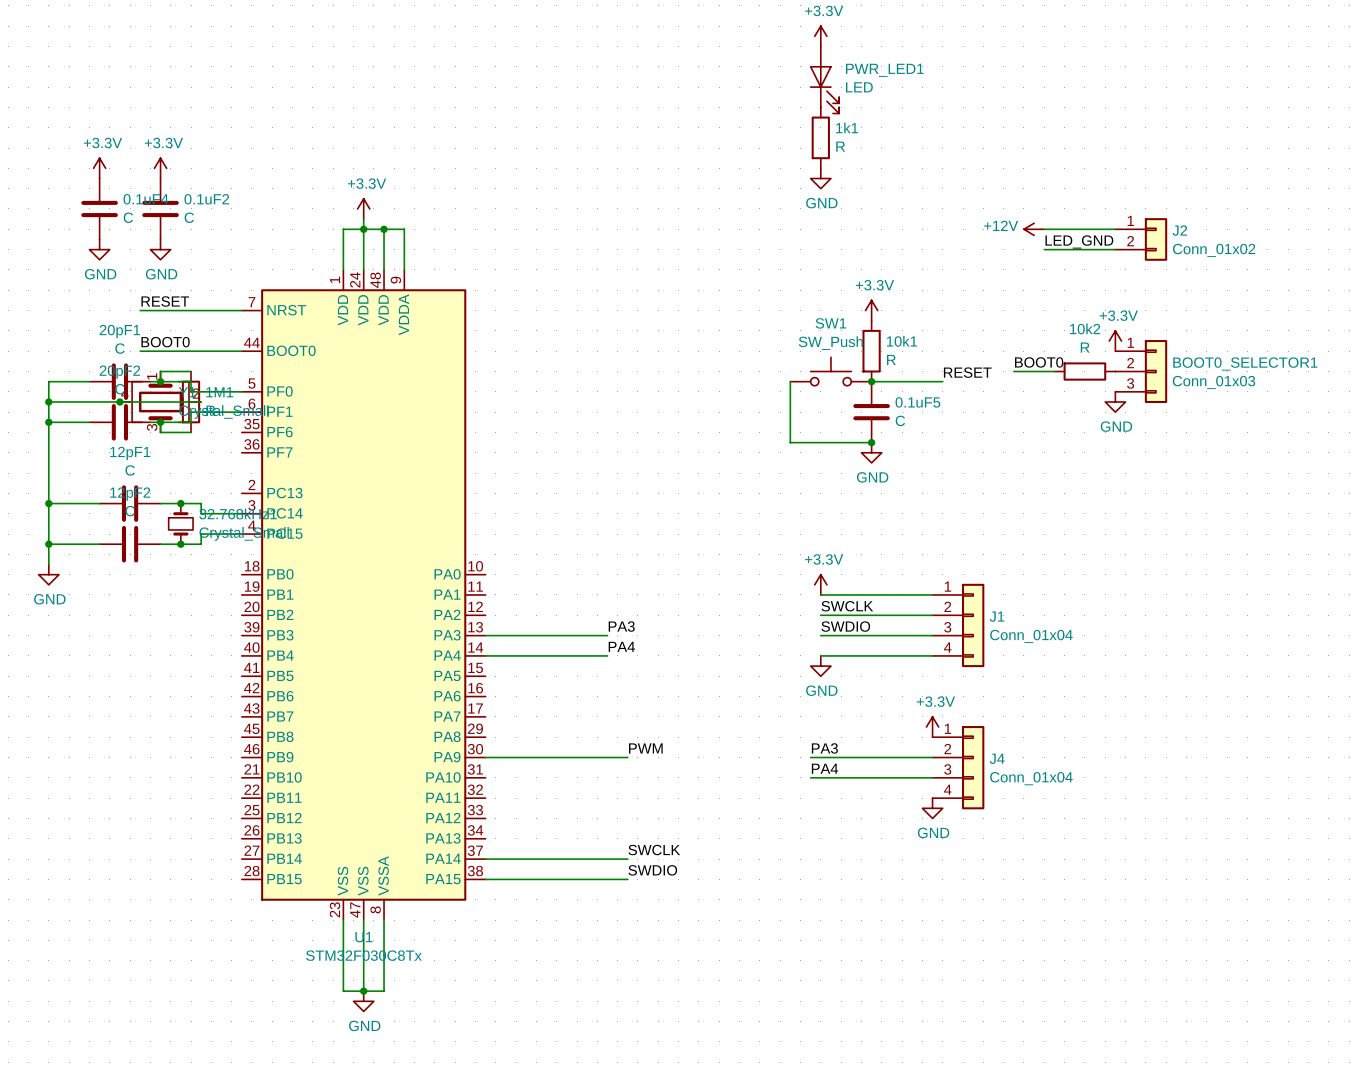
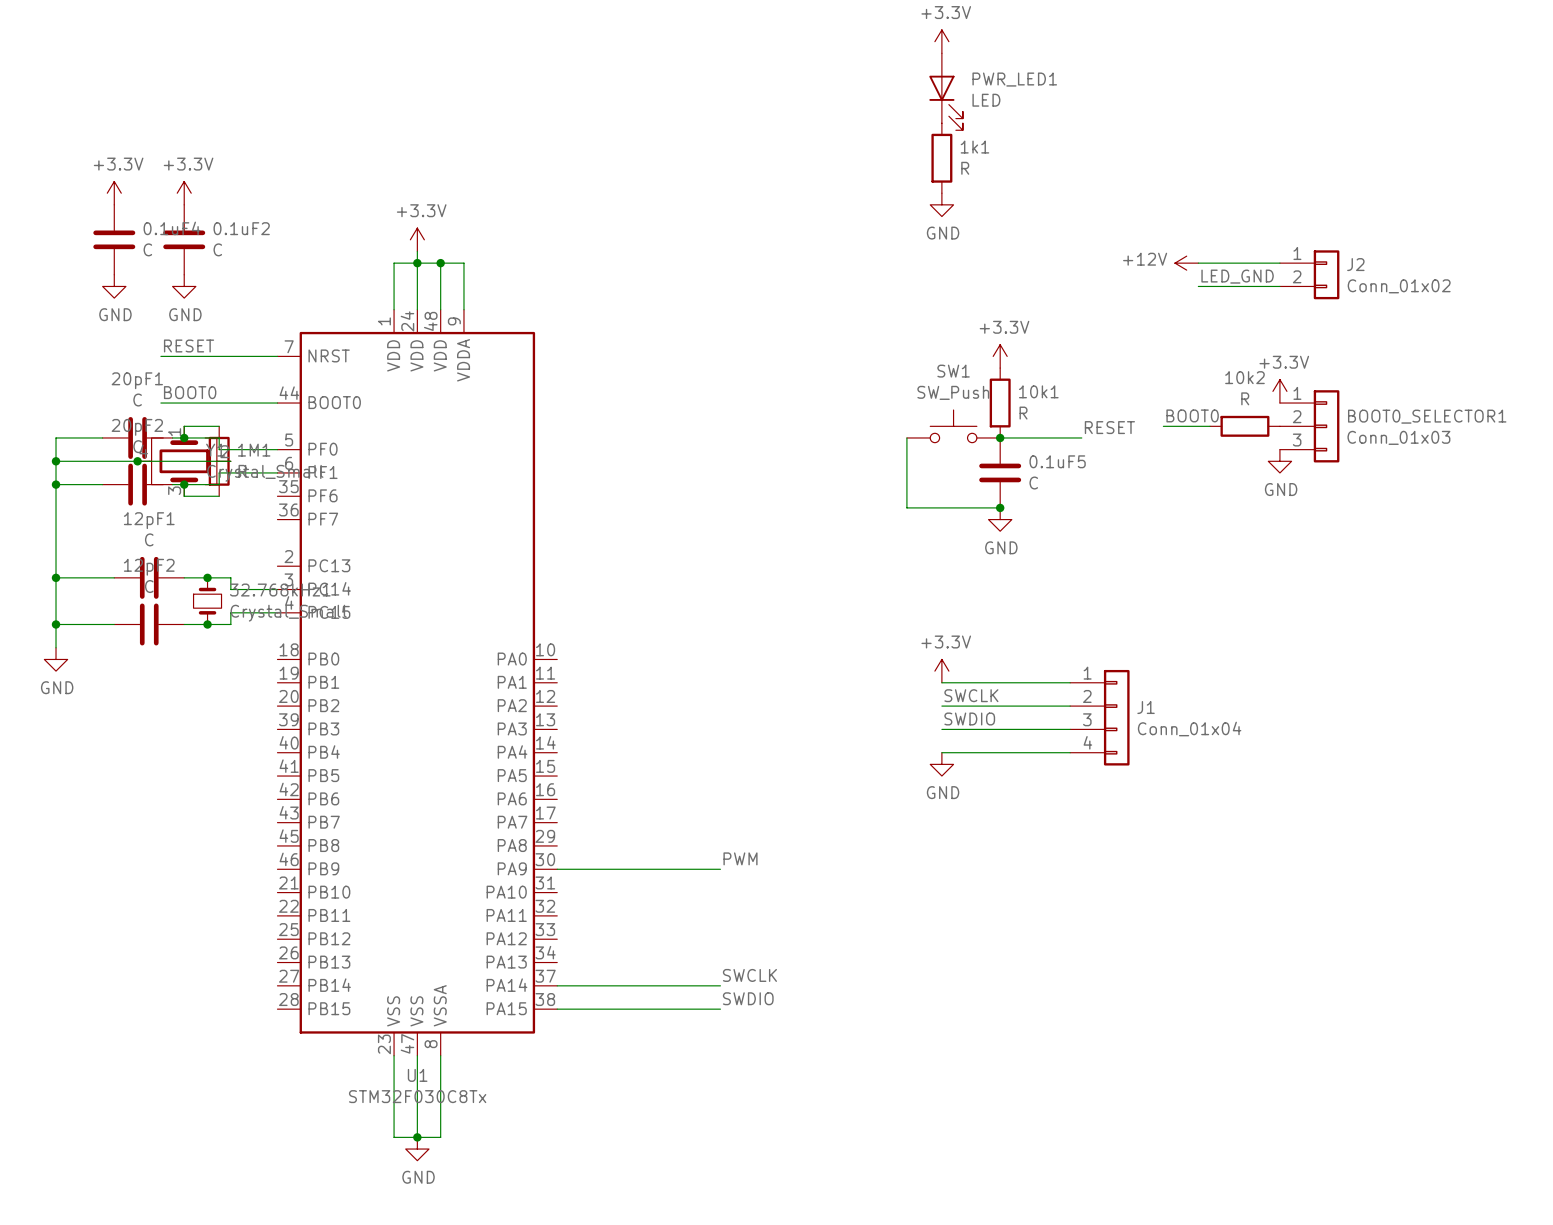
label: PA3 (621, 626) -> none
wire: (485, 635) (607, 635) -> none
label: PA4 (621, 646) -> none
wire: (485, 655) (607, 655) -> none
power symbol: +3.3V (932, 727) -> none
label: PA3 (824, 748) -> none
wire: (810, 757) (932, 757) -> none
J4: Conn_01x04 (958, 767) -> none
label: PA4 (824, 768) -> none
wire: (810, 777) (932, 777) -> none
power symbol: GND (932, 808) -> none

